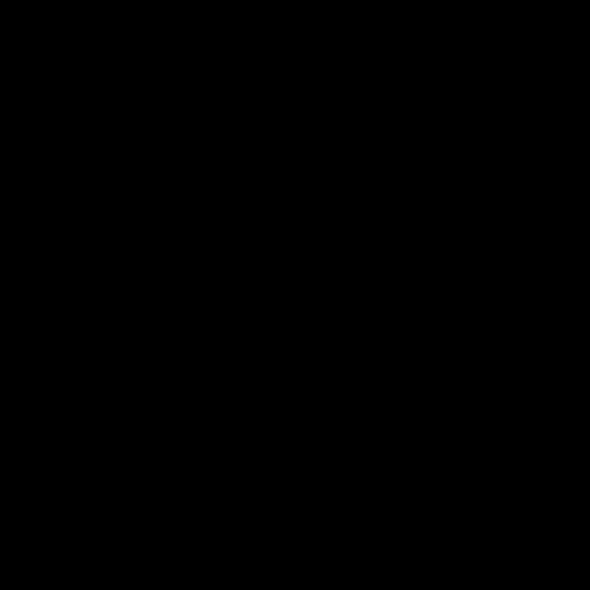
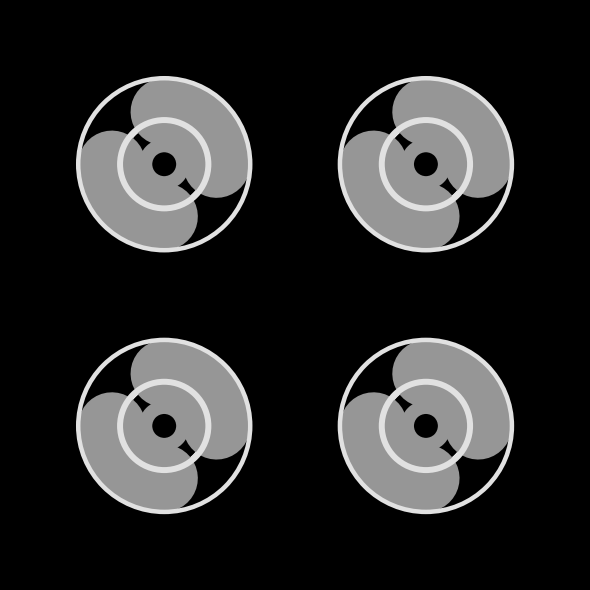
part: none -> (164, 164)
part: none -> (425, 164)
part: none -> (164, 425)
part: none -> (425, 425)

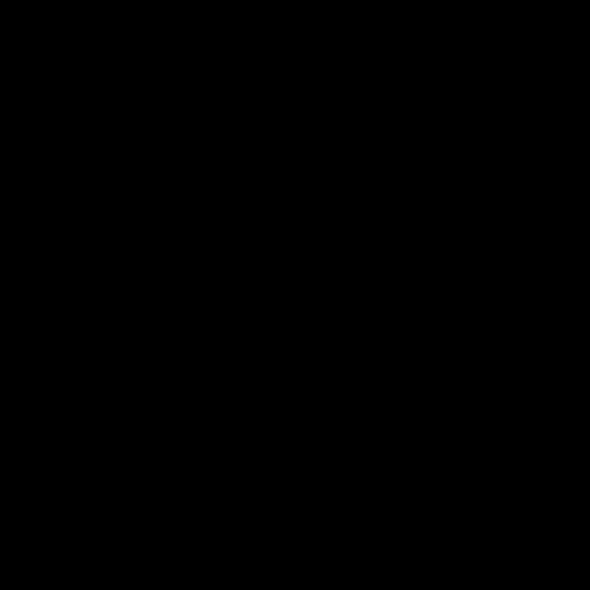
part: (164, 164) -> none
part: (425, 164) -> none
part: (164, 425) -> none
part: (425, 425) -> none

